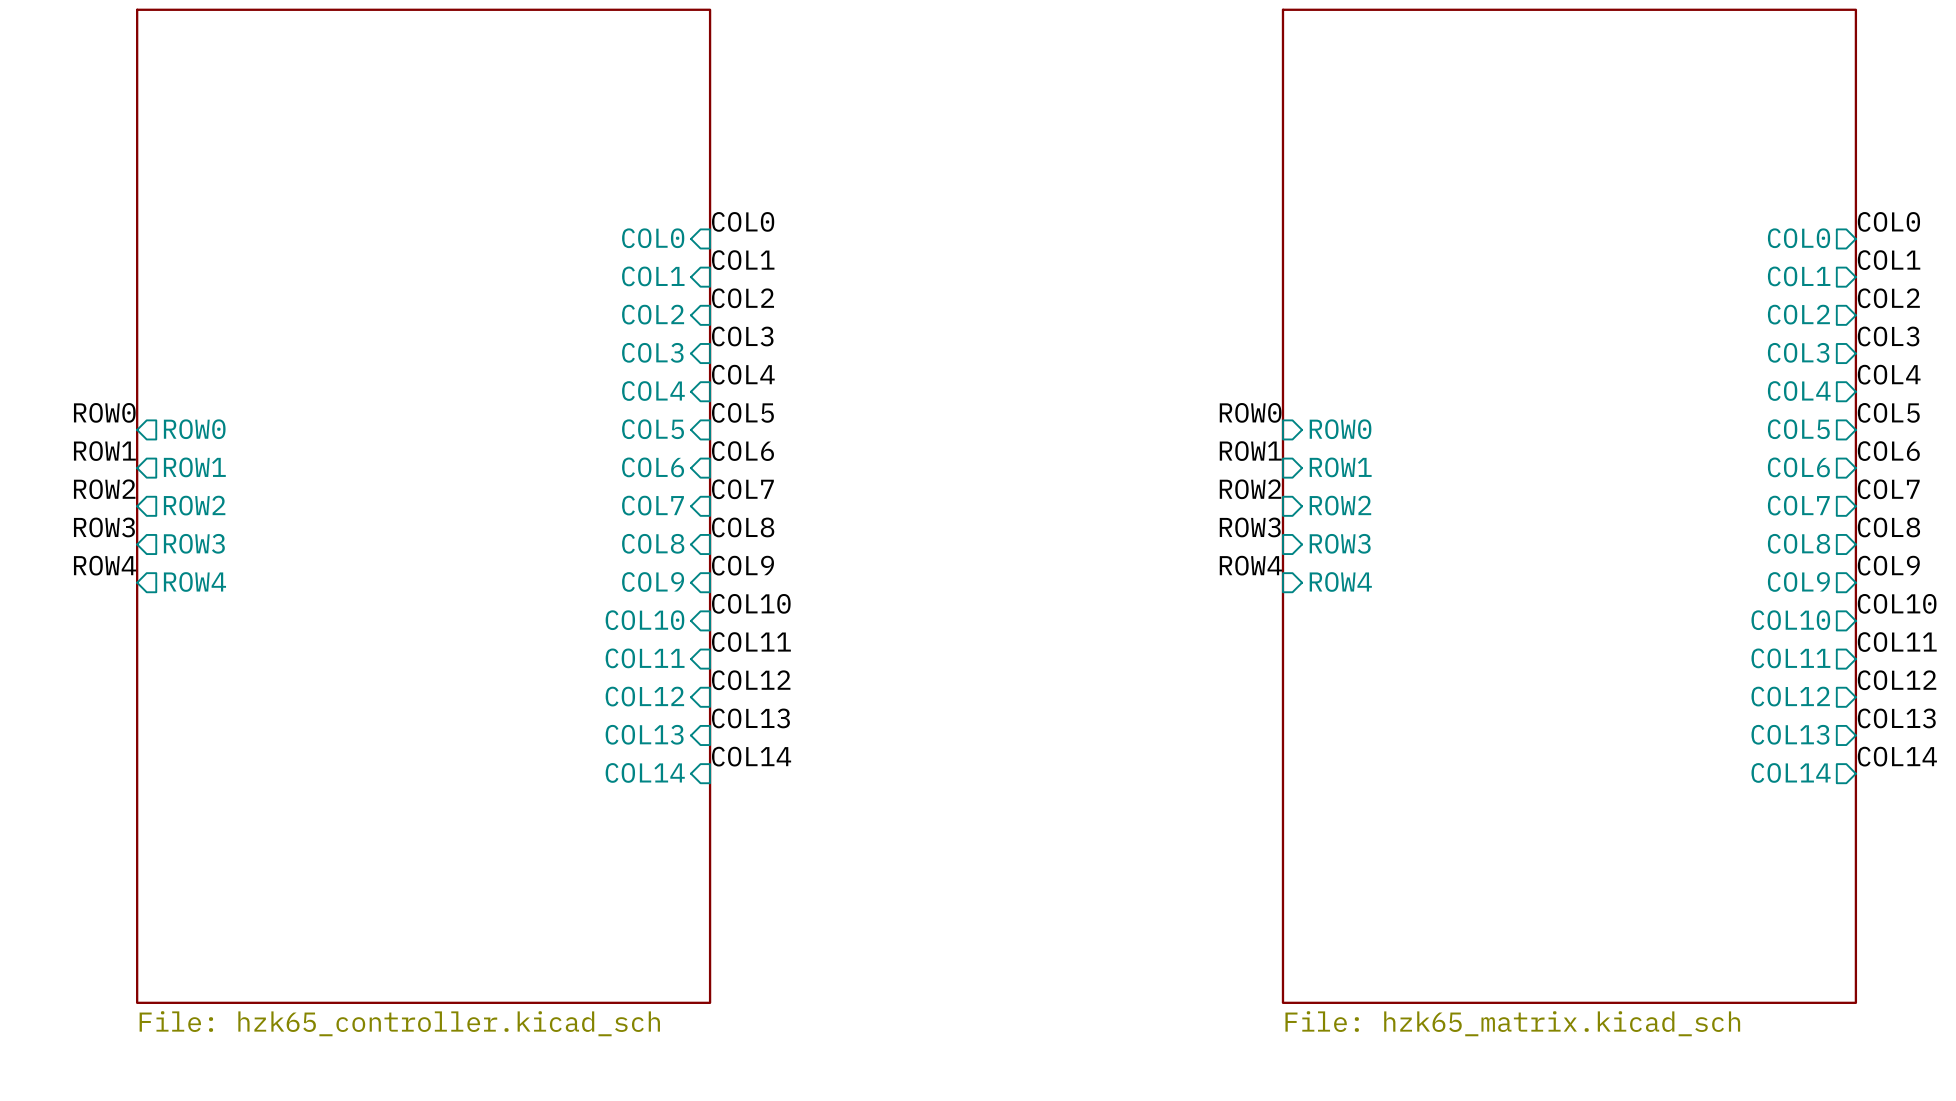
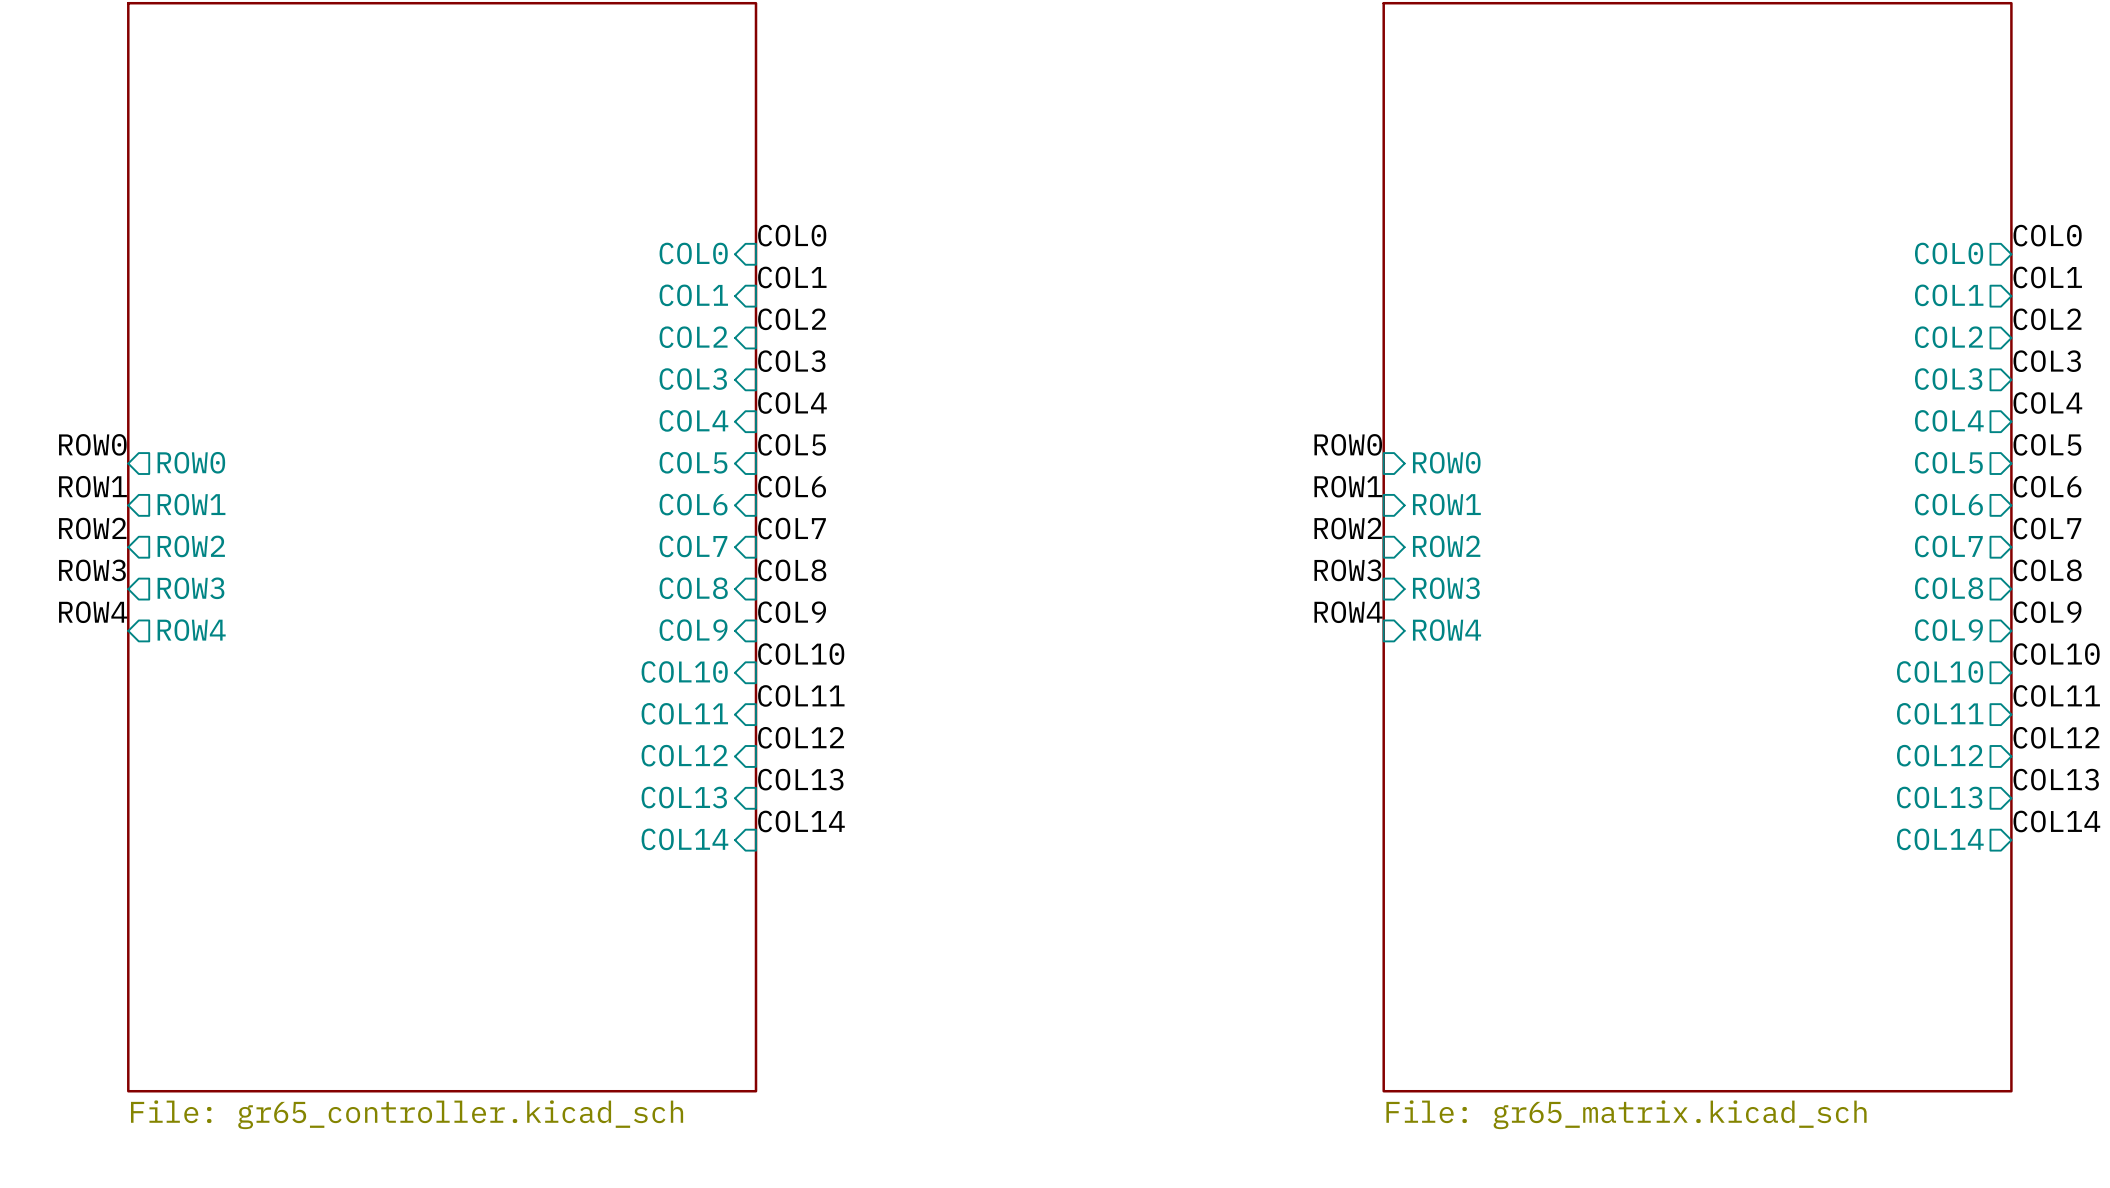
sheet value: File: hzk65_controller.kicad_sch (399, 1023) -> File: gr65_controller.kicad_sch (407, 1114)
sheet value: File: hzk65_matrix.kicad_sch (1512, 1023) -> File: gr65_matrix.kicad_sch (1626, 1114)

